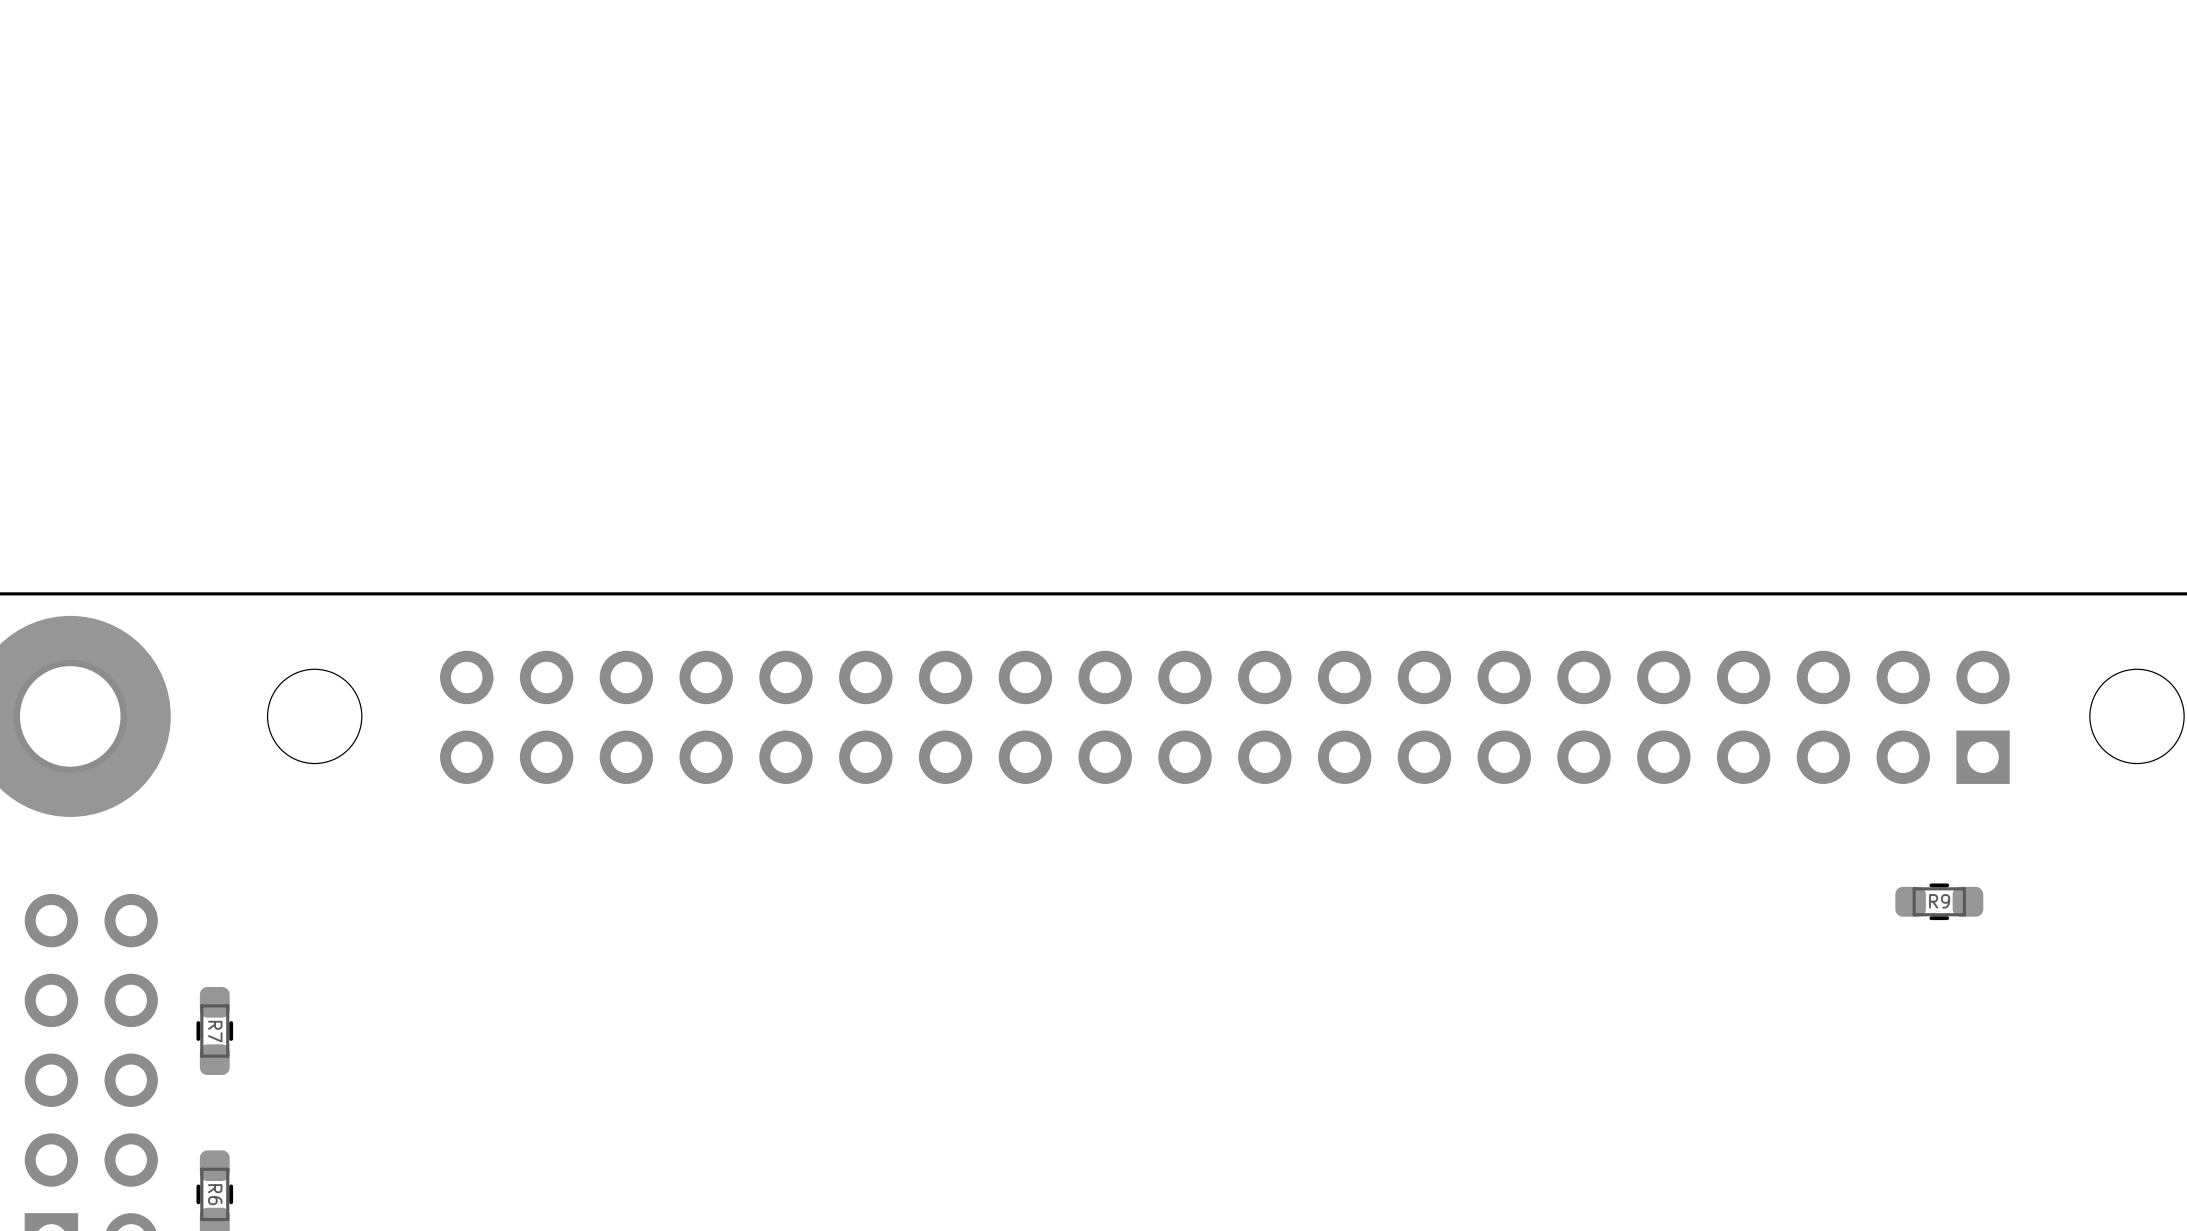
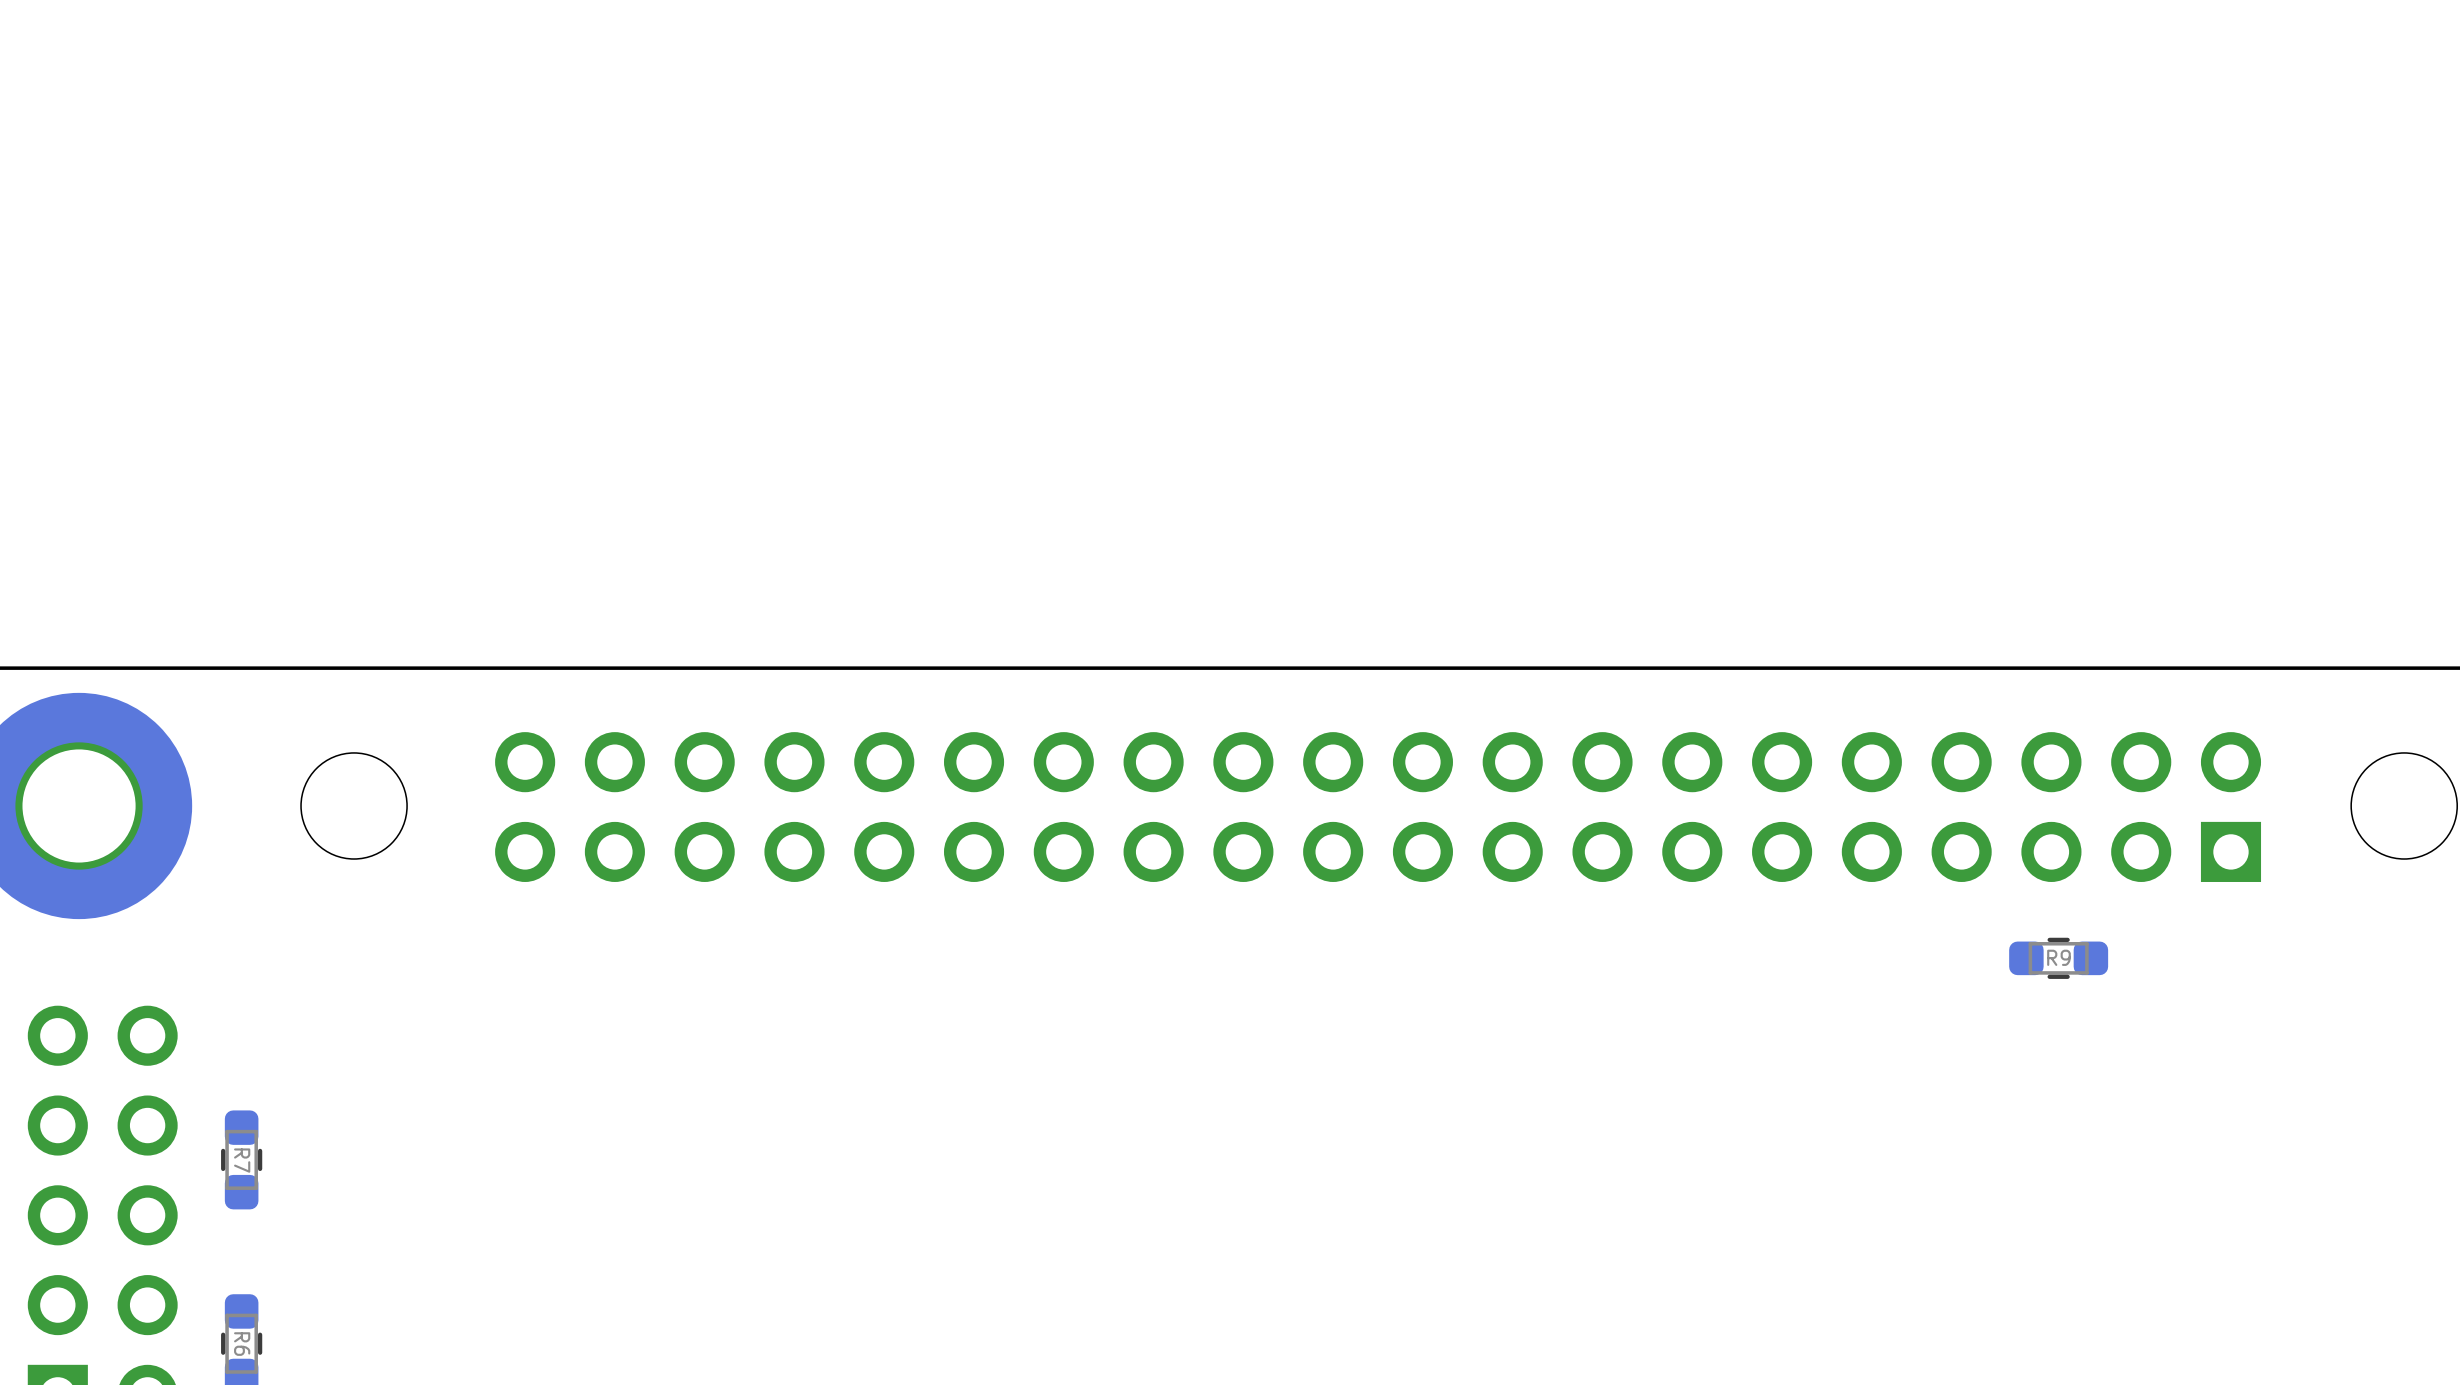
R9 position: (1939, 901) -> (2058, 958)

